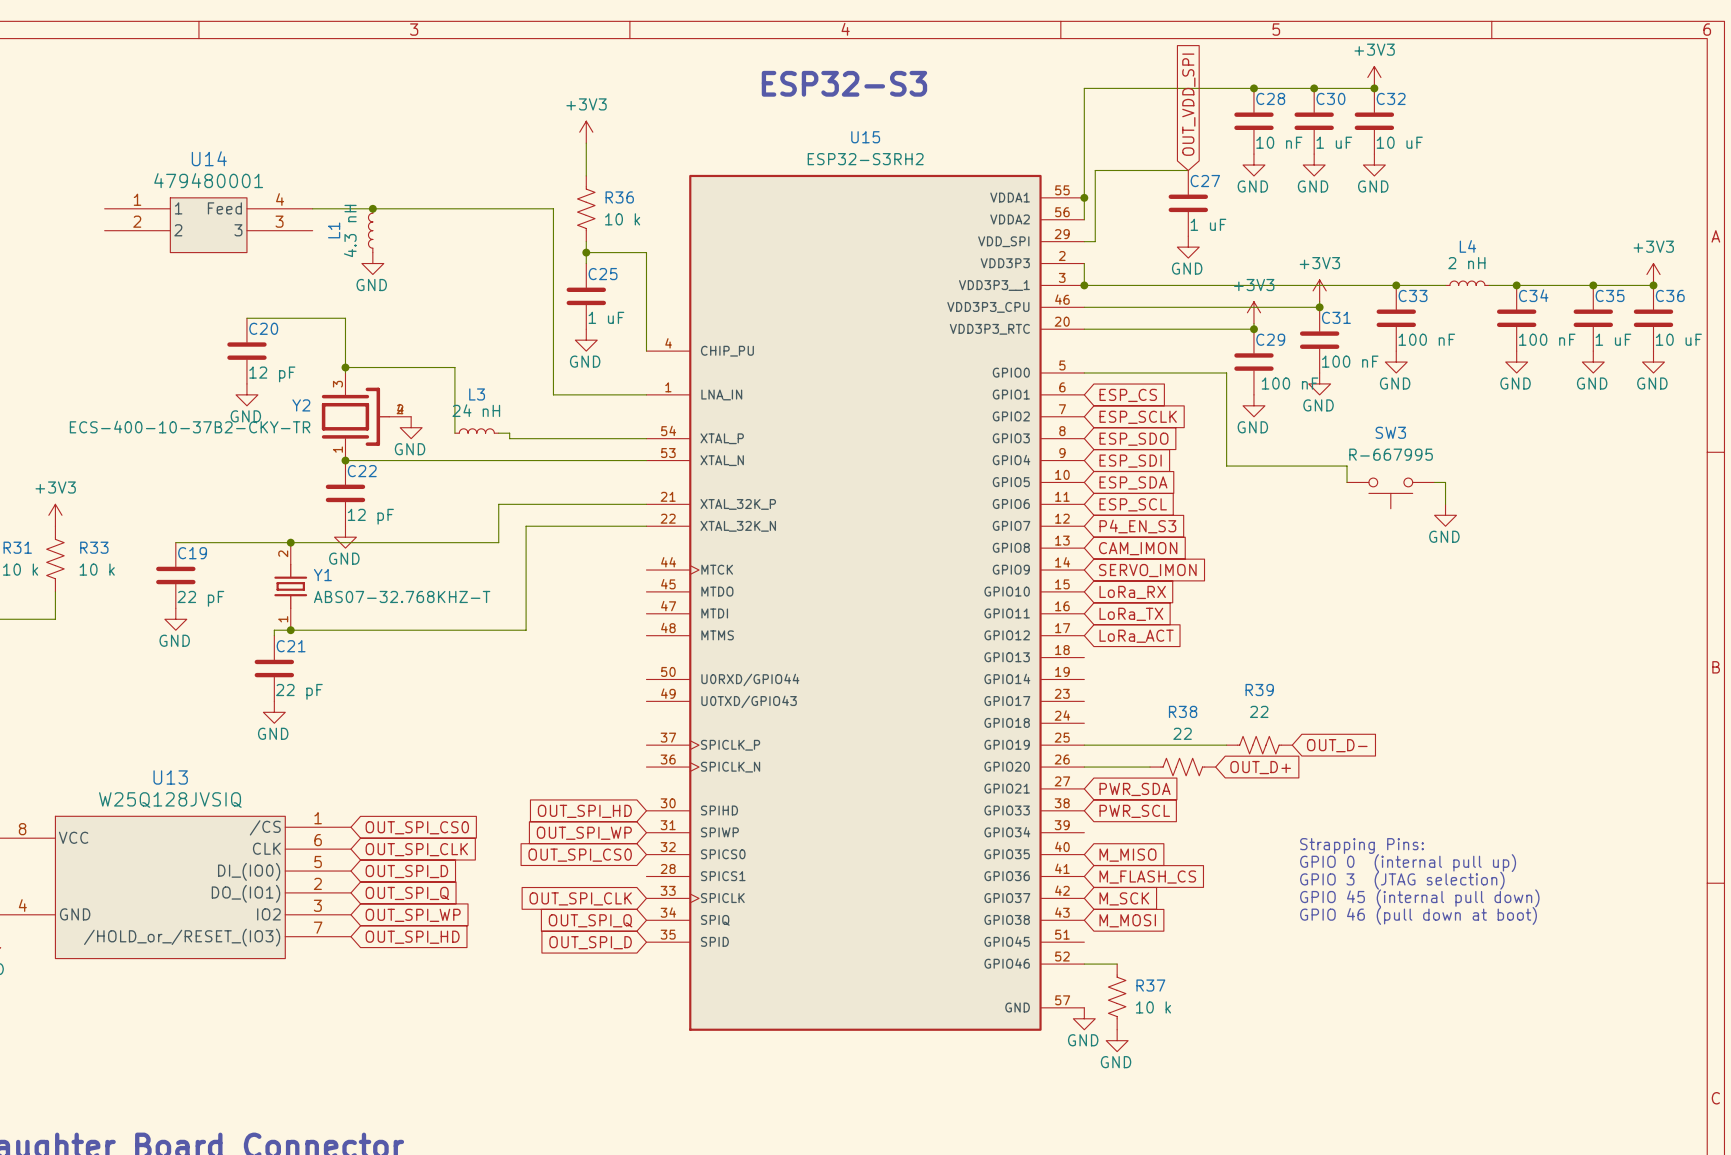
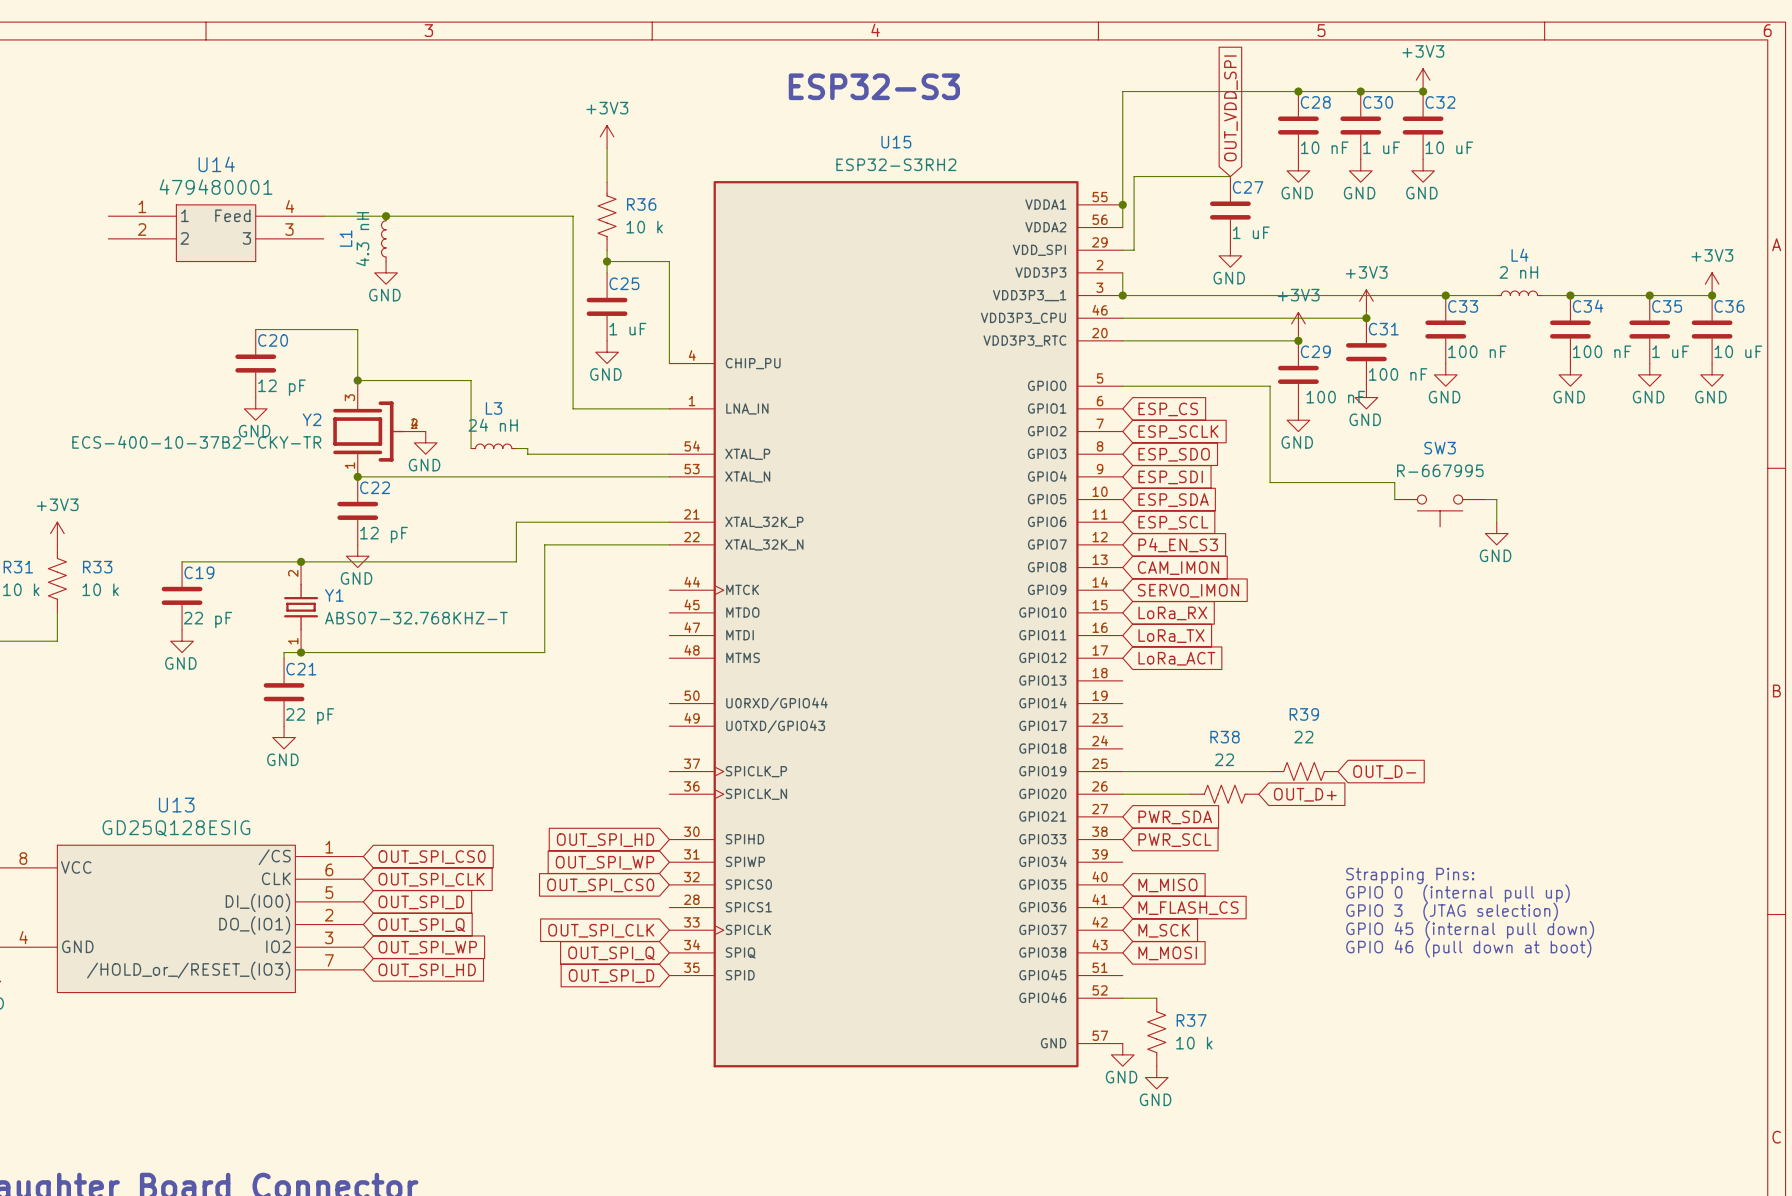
U13 value: W25Q128JVSIQ (170, 800) -> GD25Q128ESIG (176, 828)

